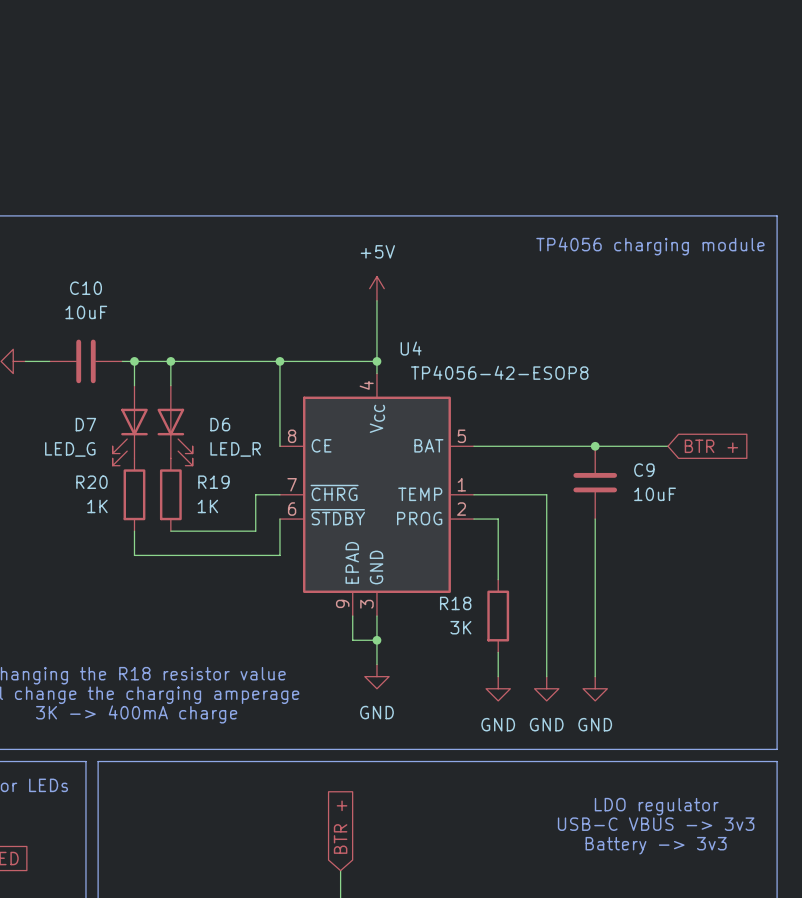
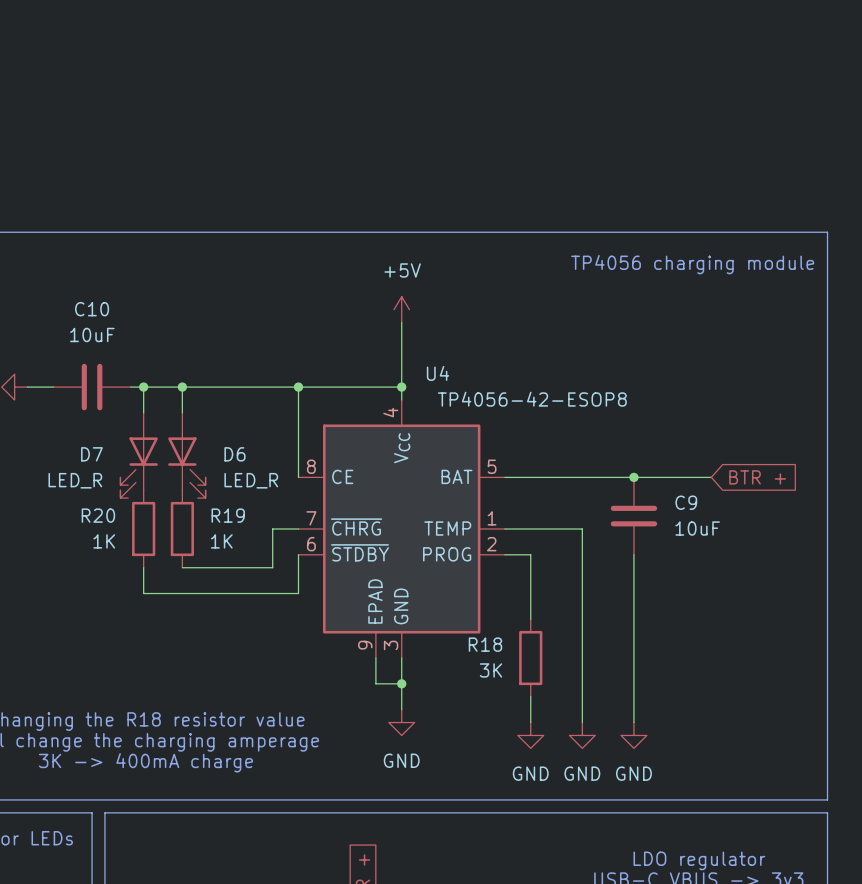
D7 value: LED_G (70, 449) -> LED_R (75, 480)

